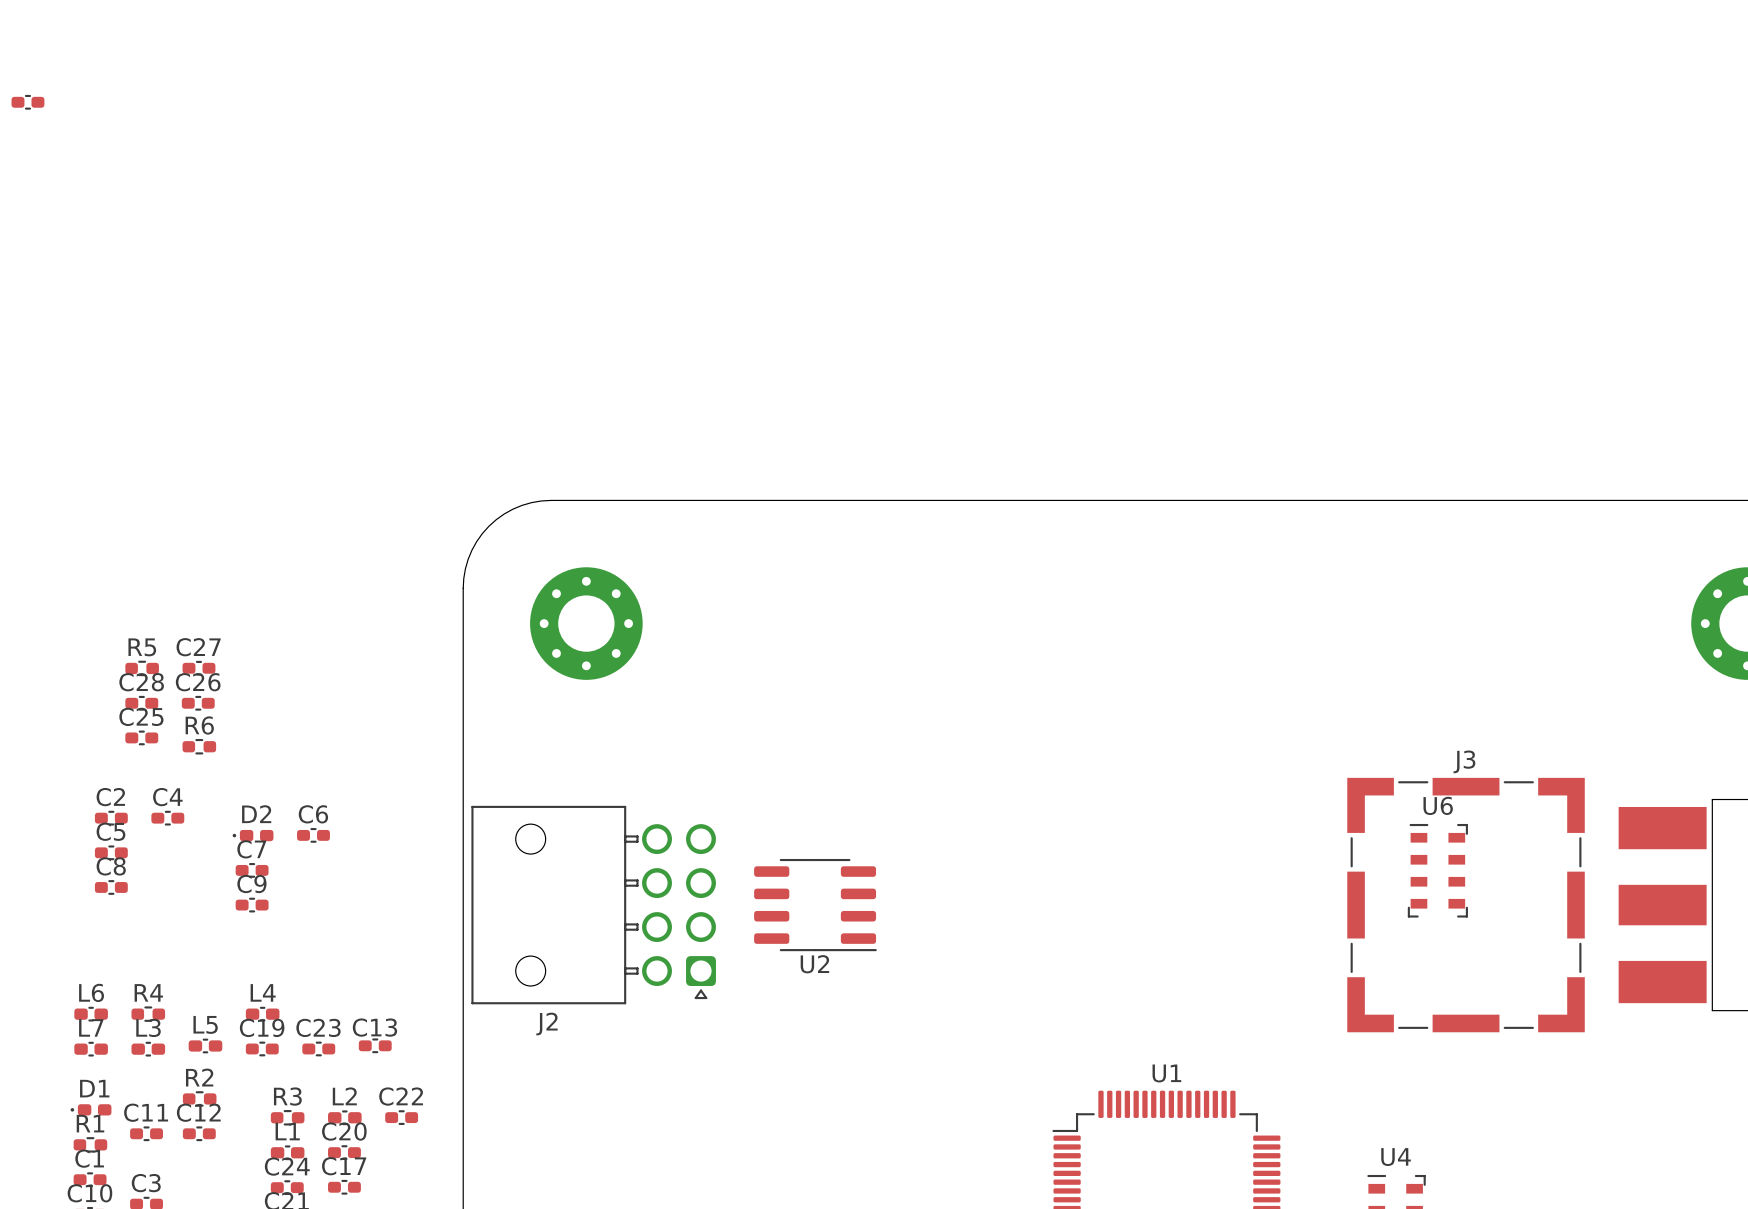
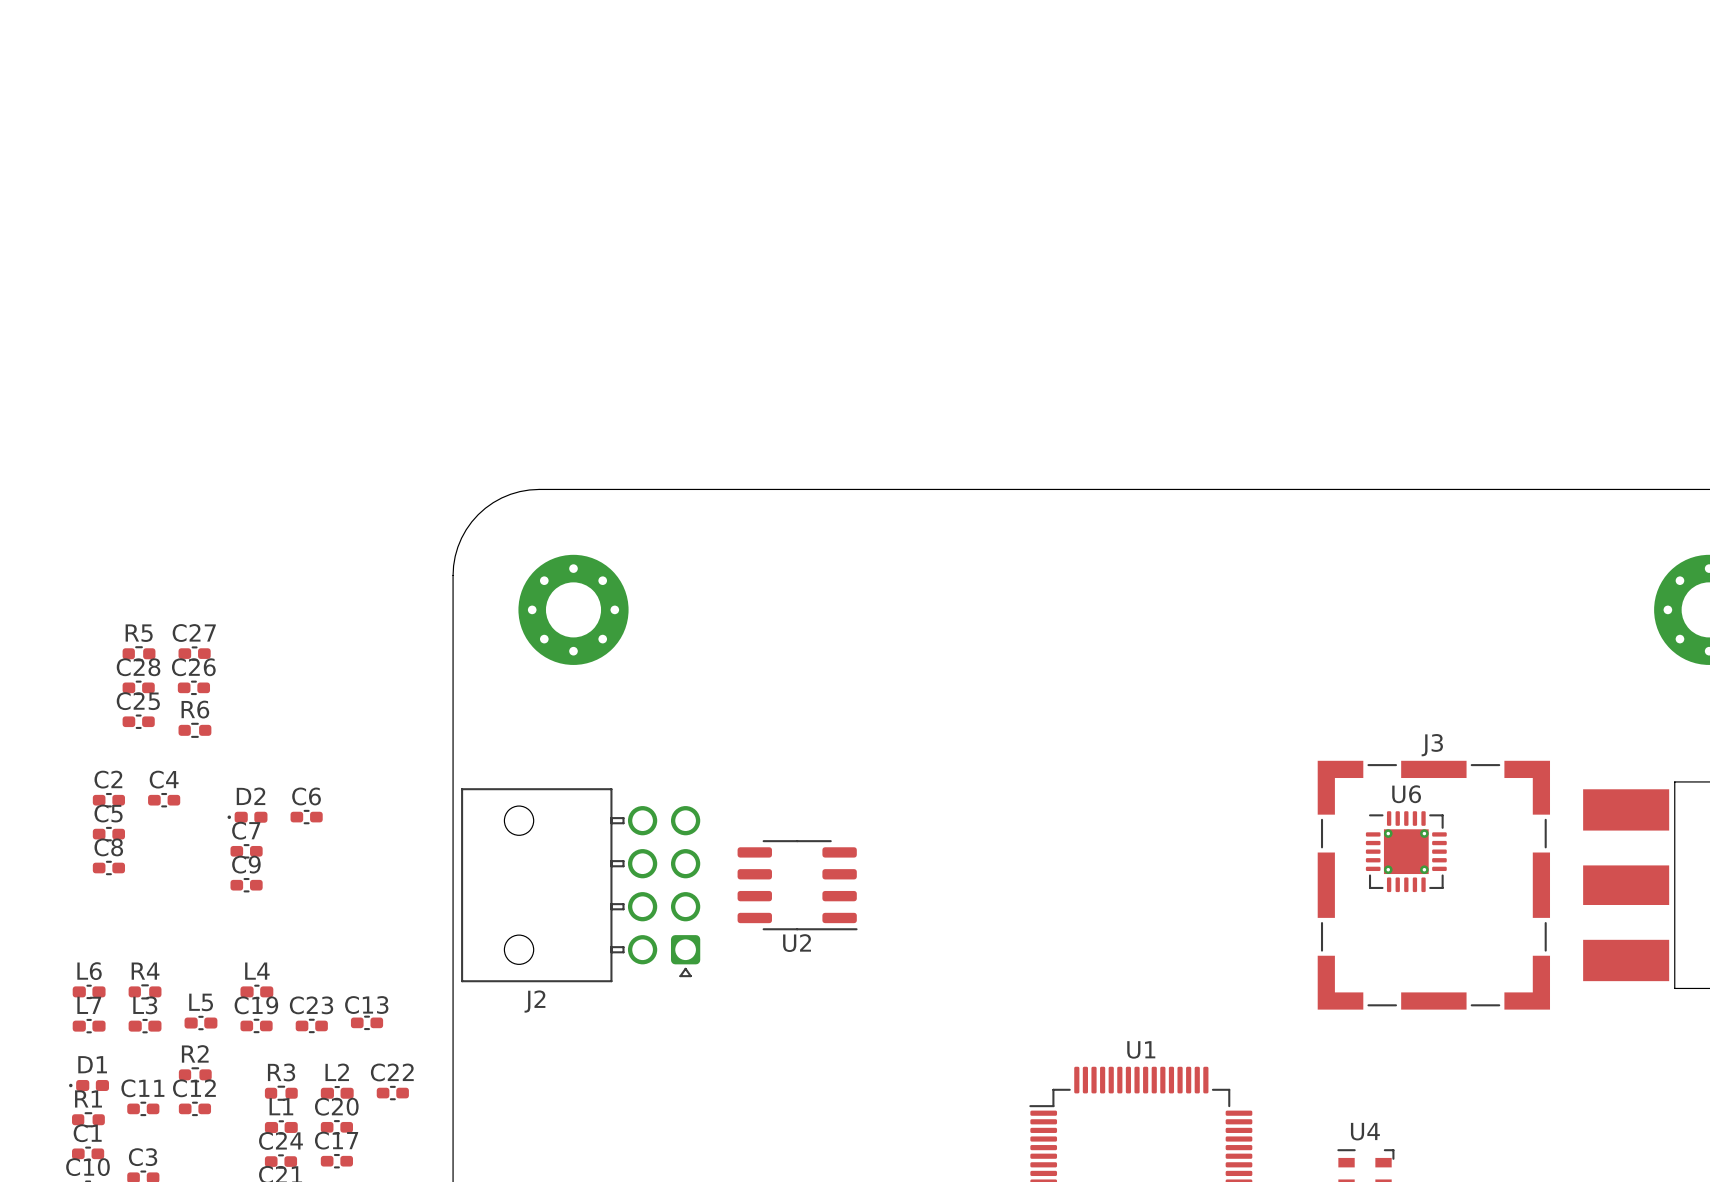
part: (27, 102) -> none
U6 footprint: [1407, 823, 1468, 918] -> [1365, 811, 1447, 893]

